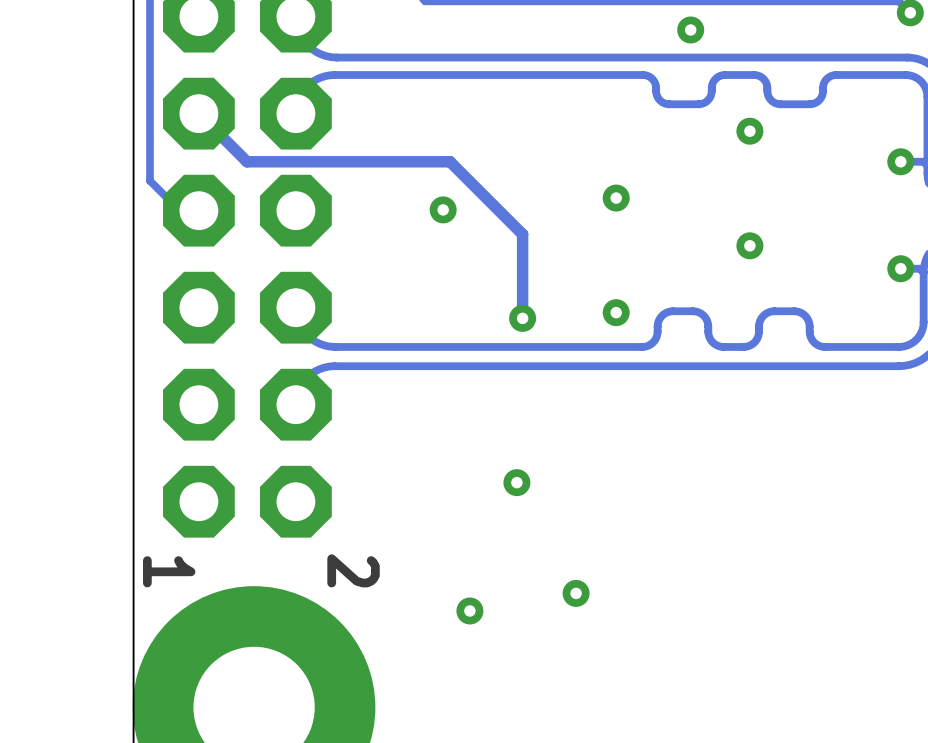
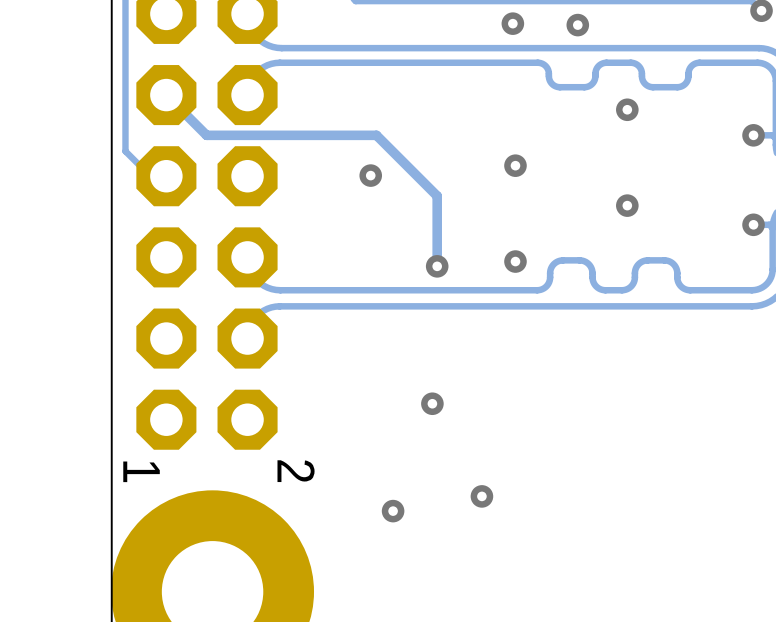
via: none -> (512, 23)

